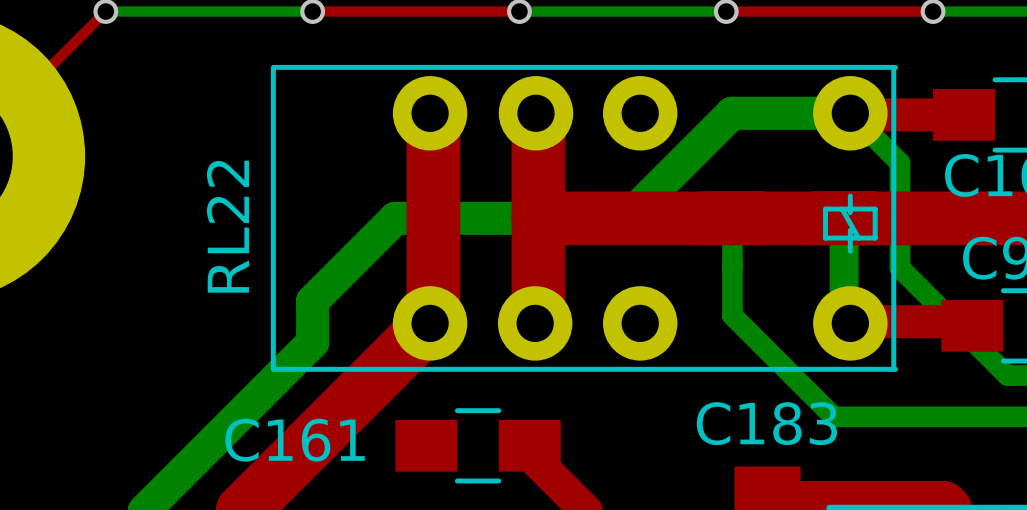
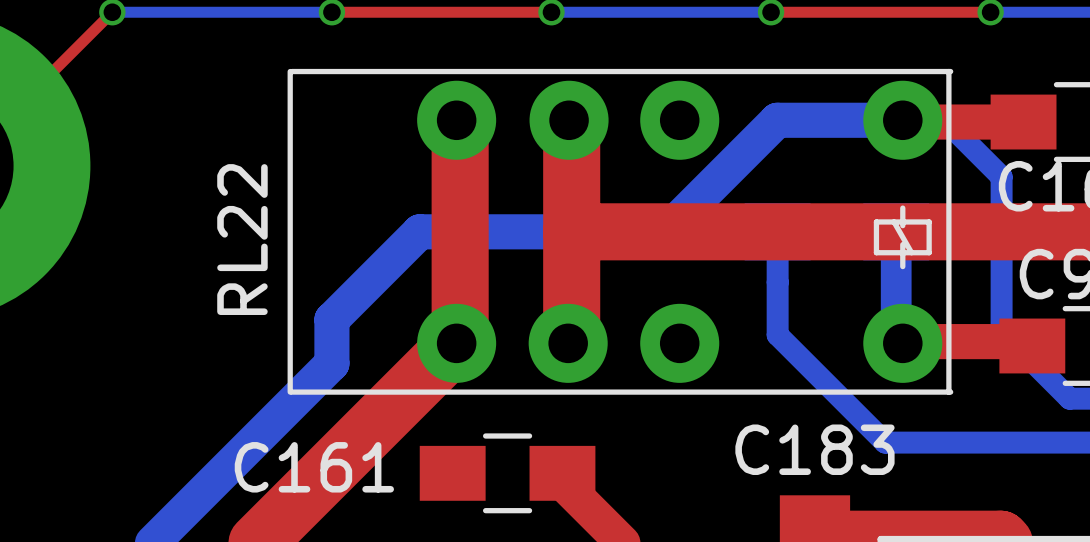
bottom track: (850, 113) (899, 162) (899, 267) (943, 311) -> (902, 120) (944, 120) (1001, 176) (1001, 330)

